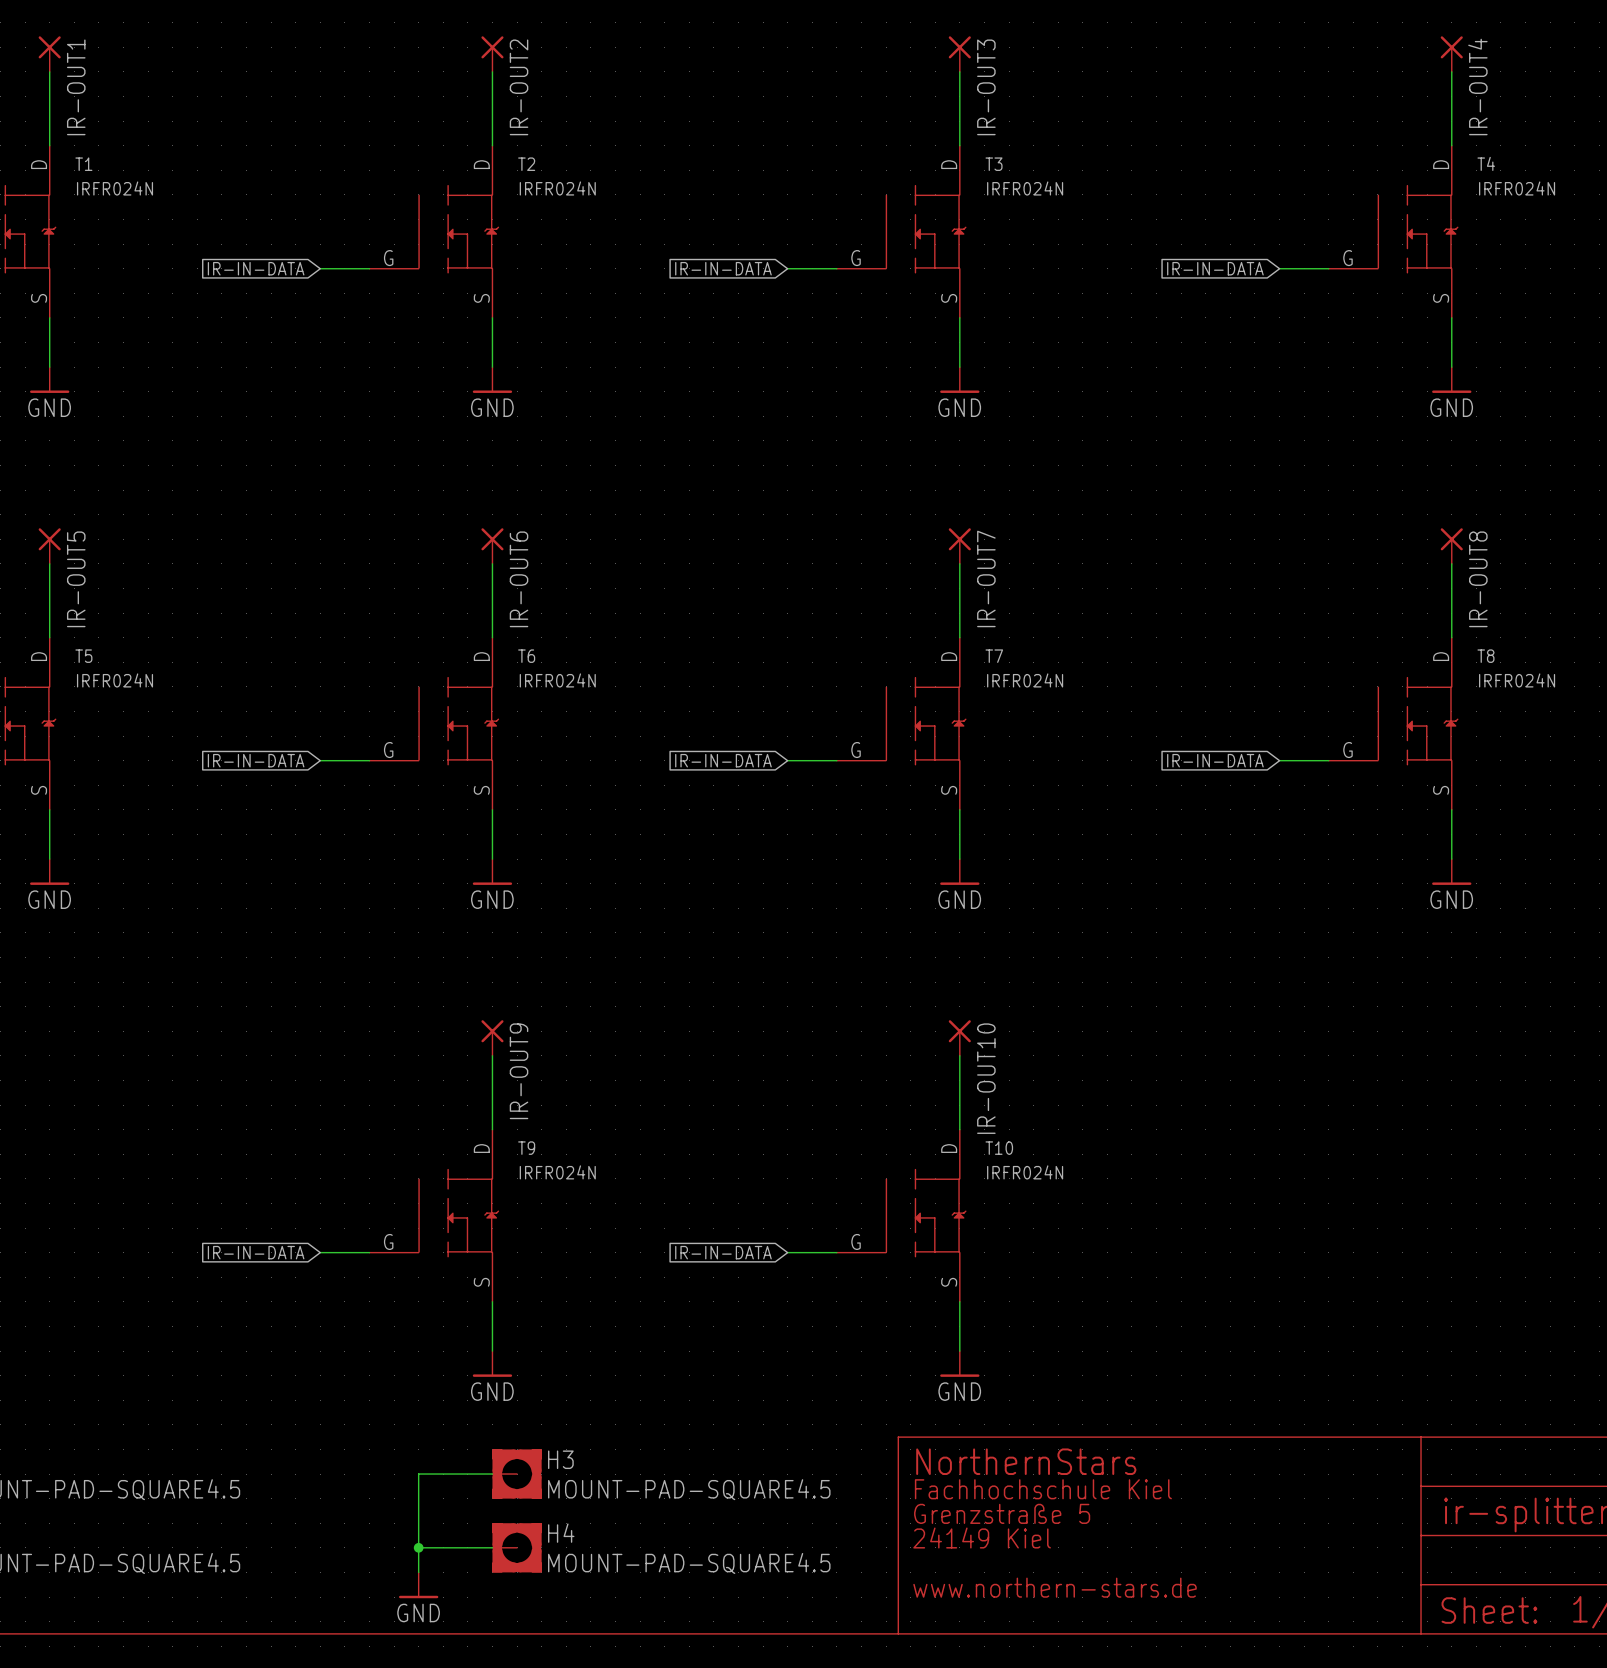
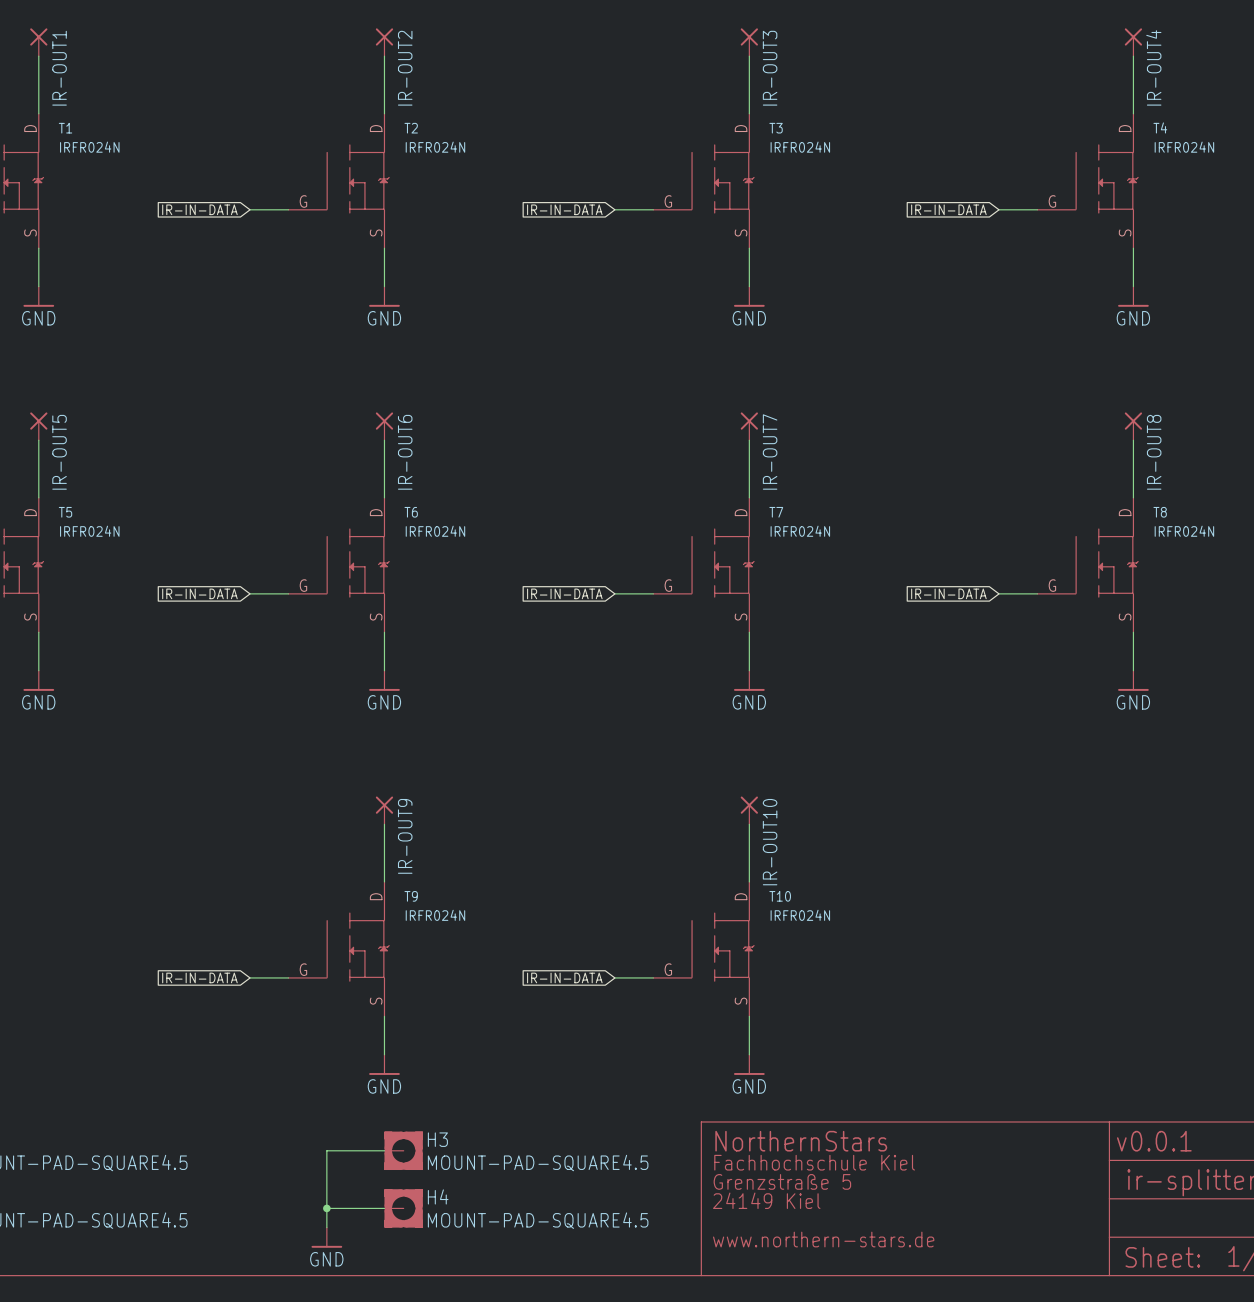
text: none -> v0.0.1 (1154, 1141)

